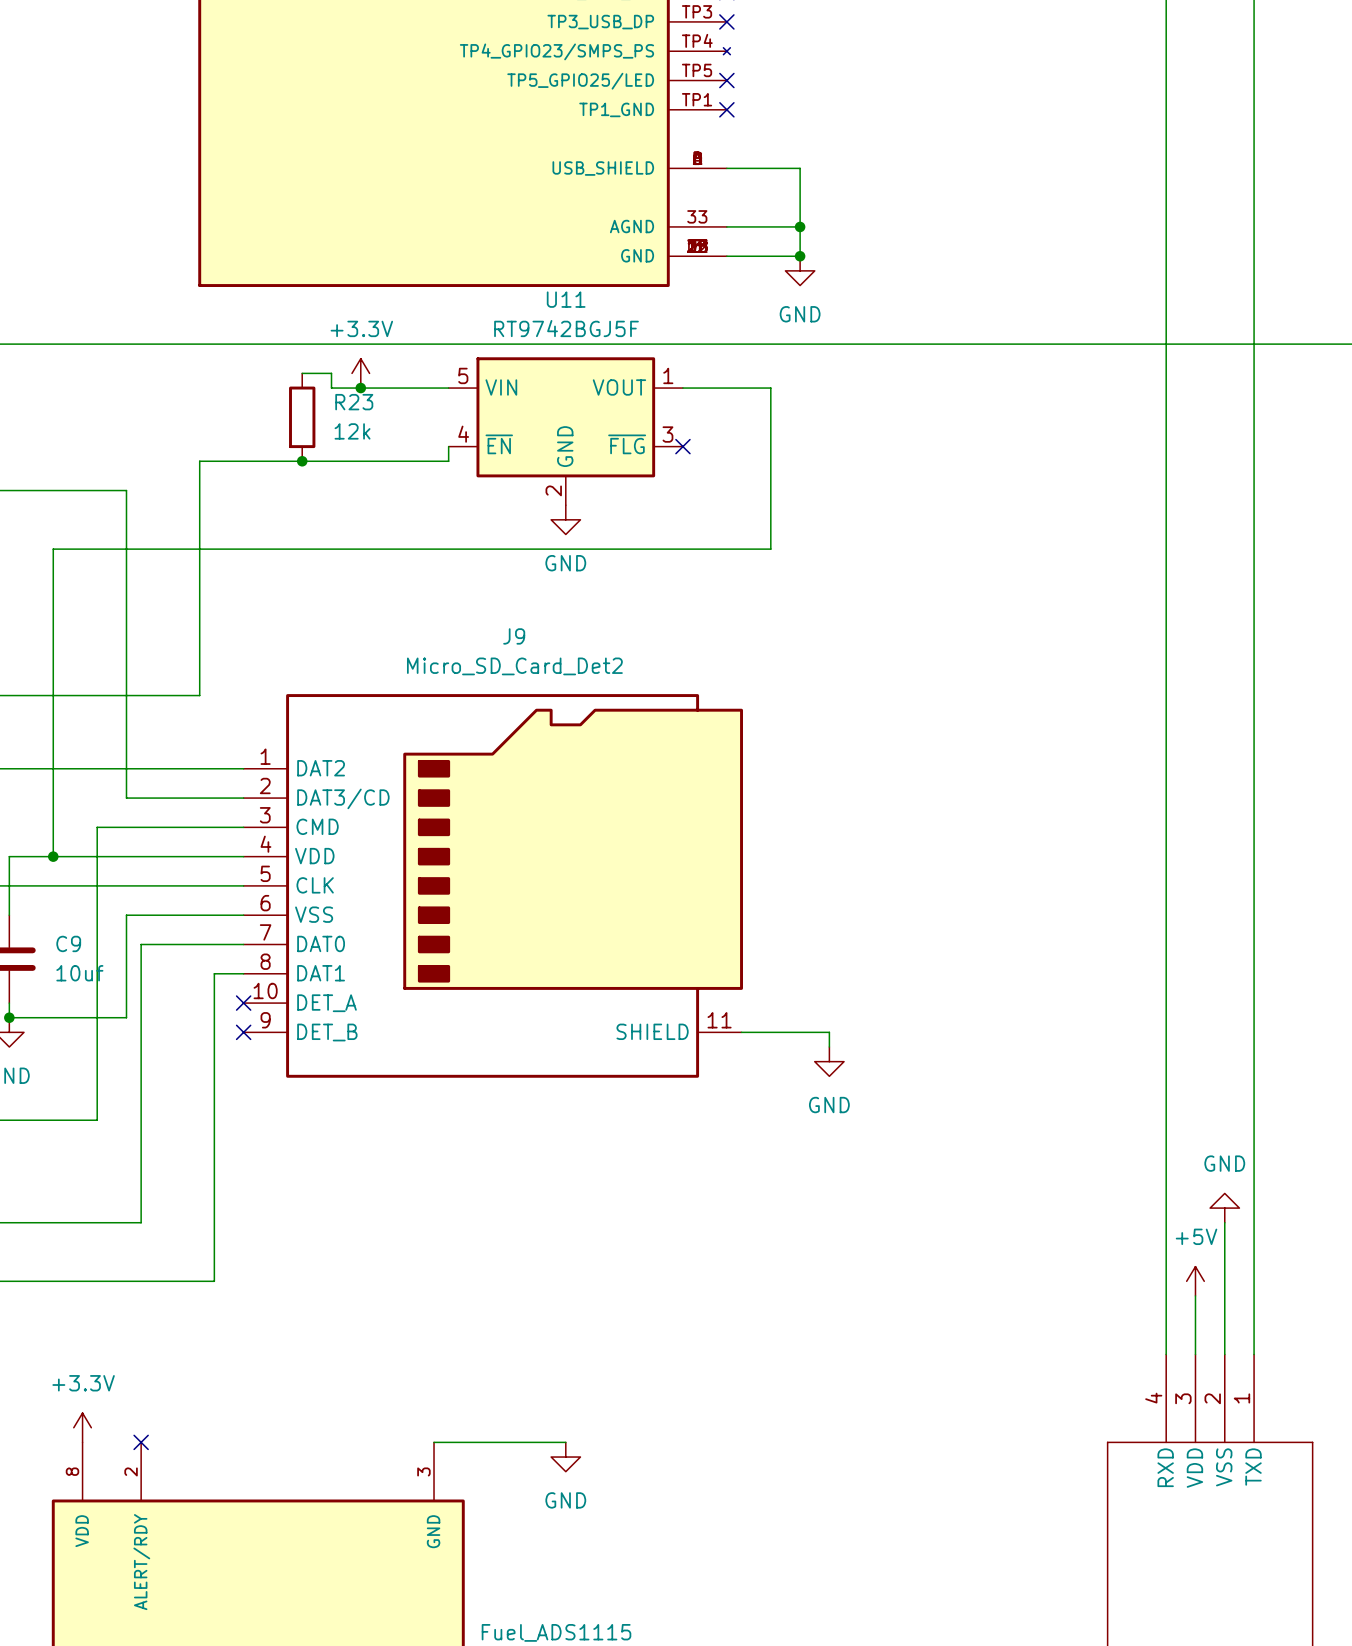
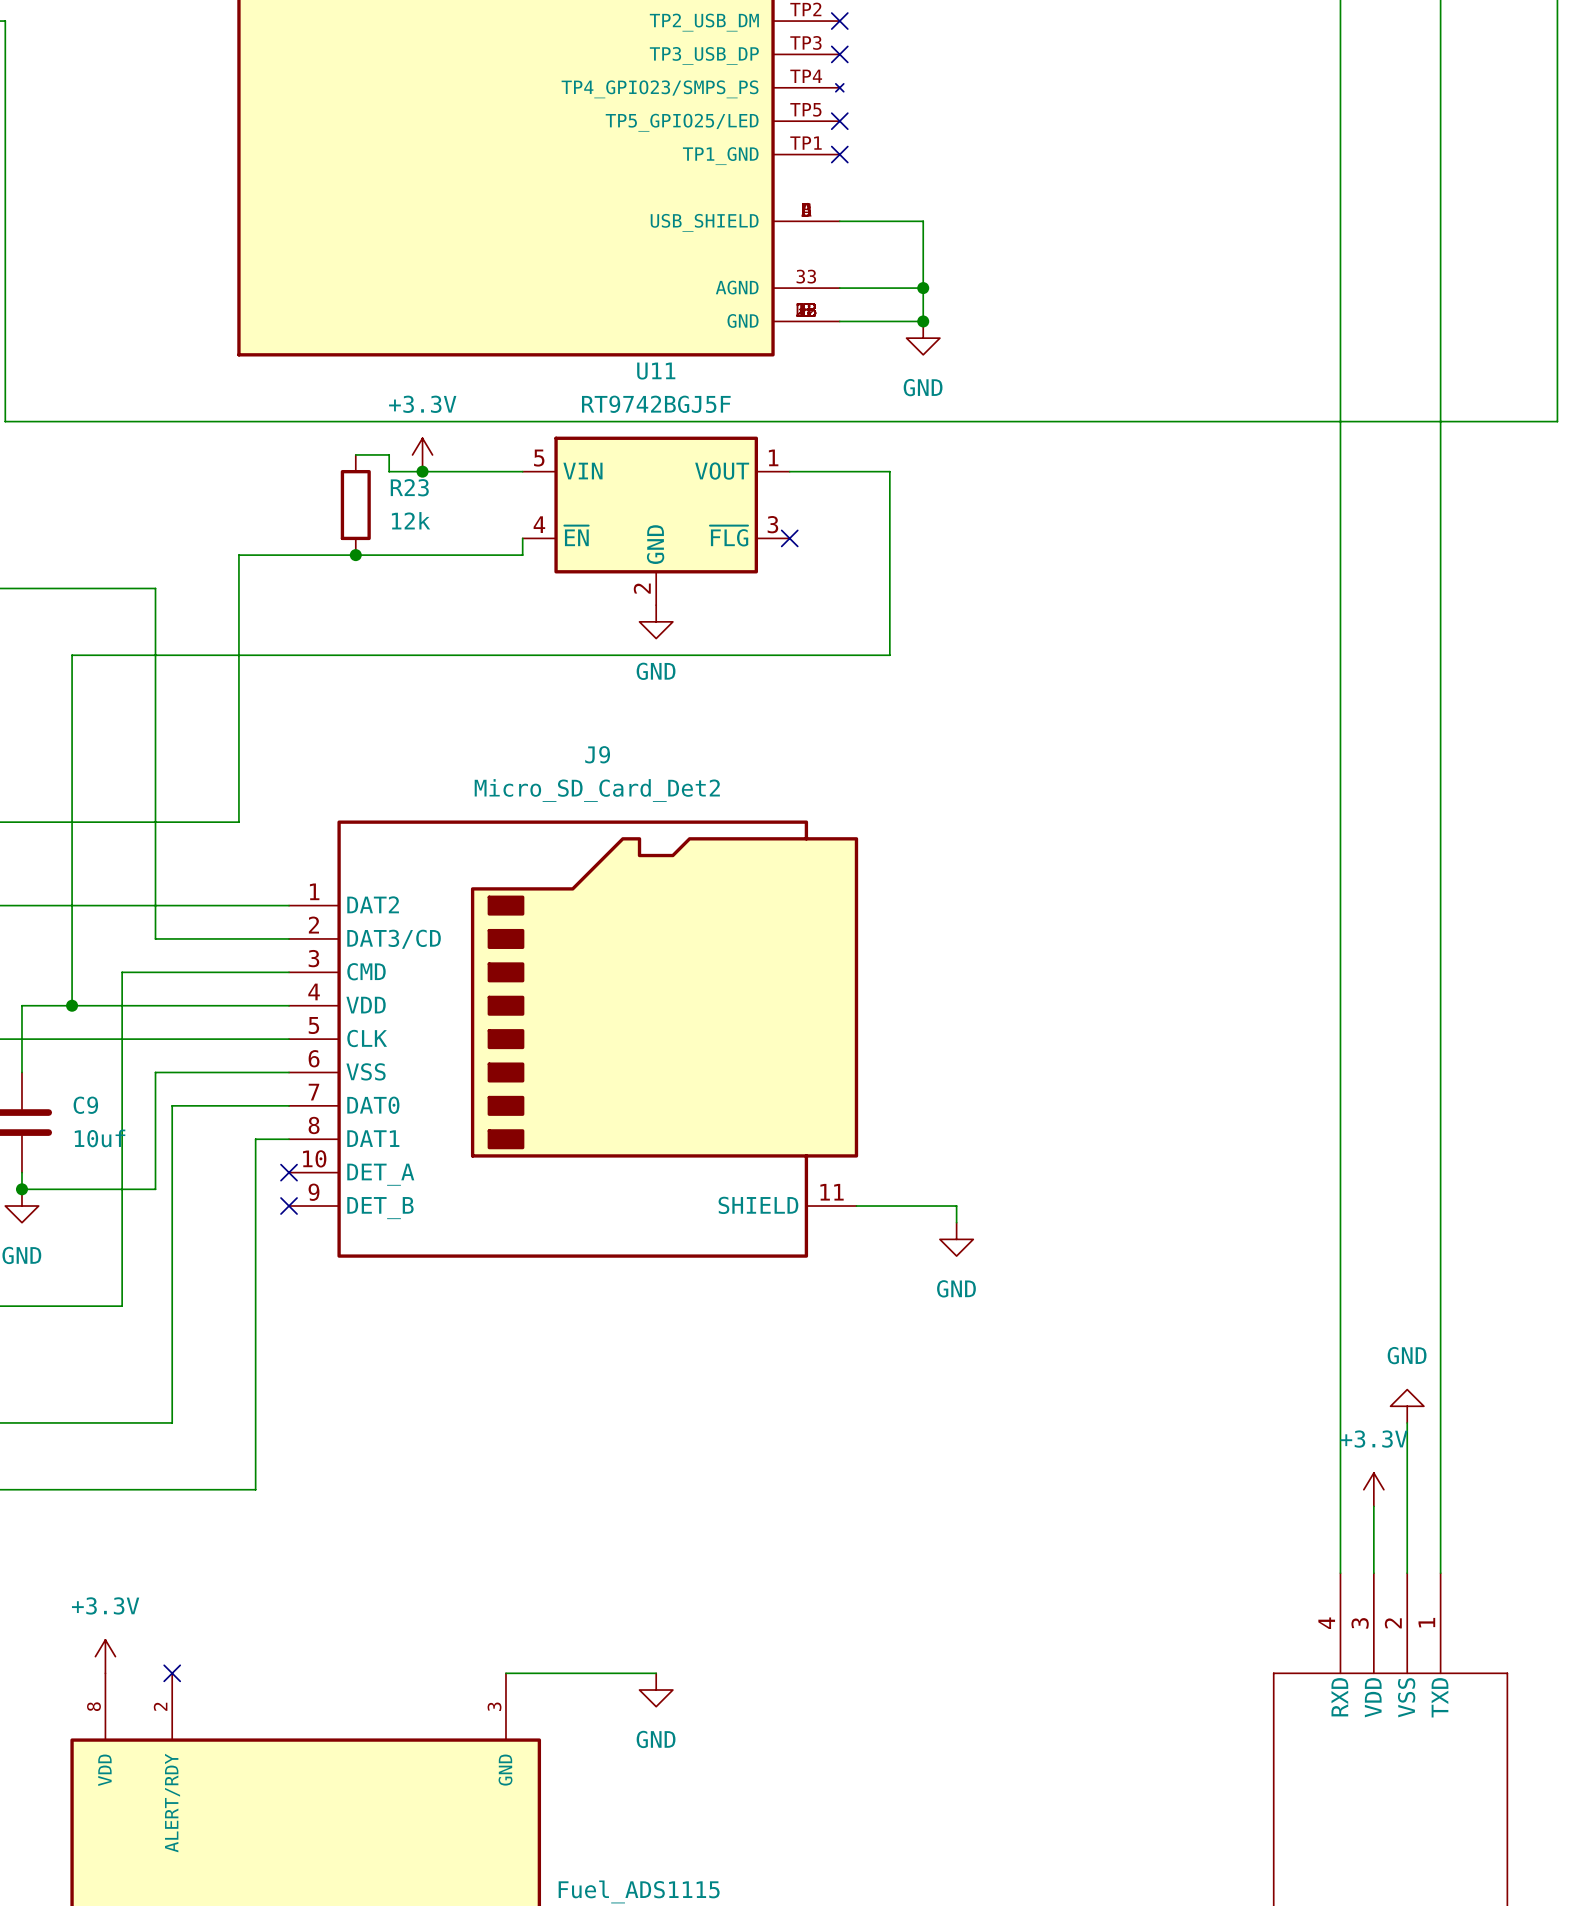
power symbol: +5V (1195, 1281) -> +3.3V (1373, 1489)

